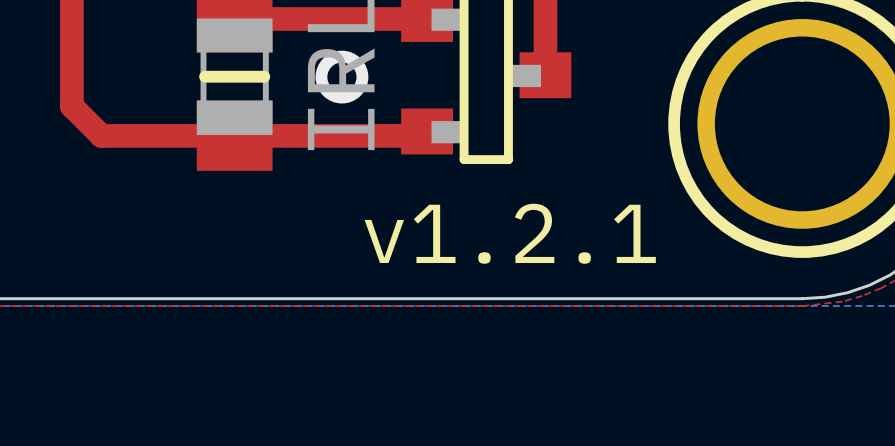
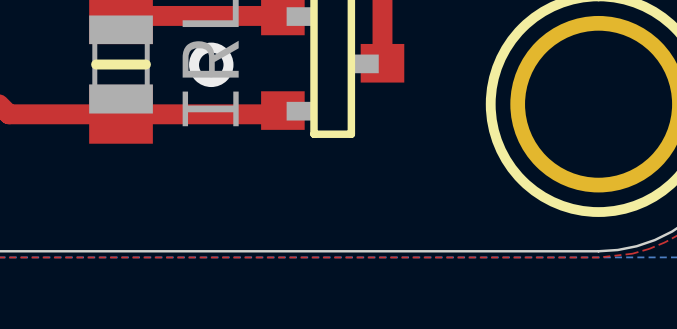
text: v1.2.1 (510, 233) -> none

